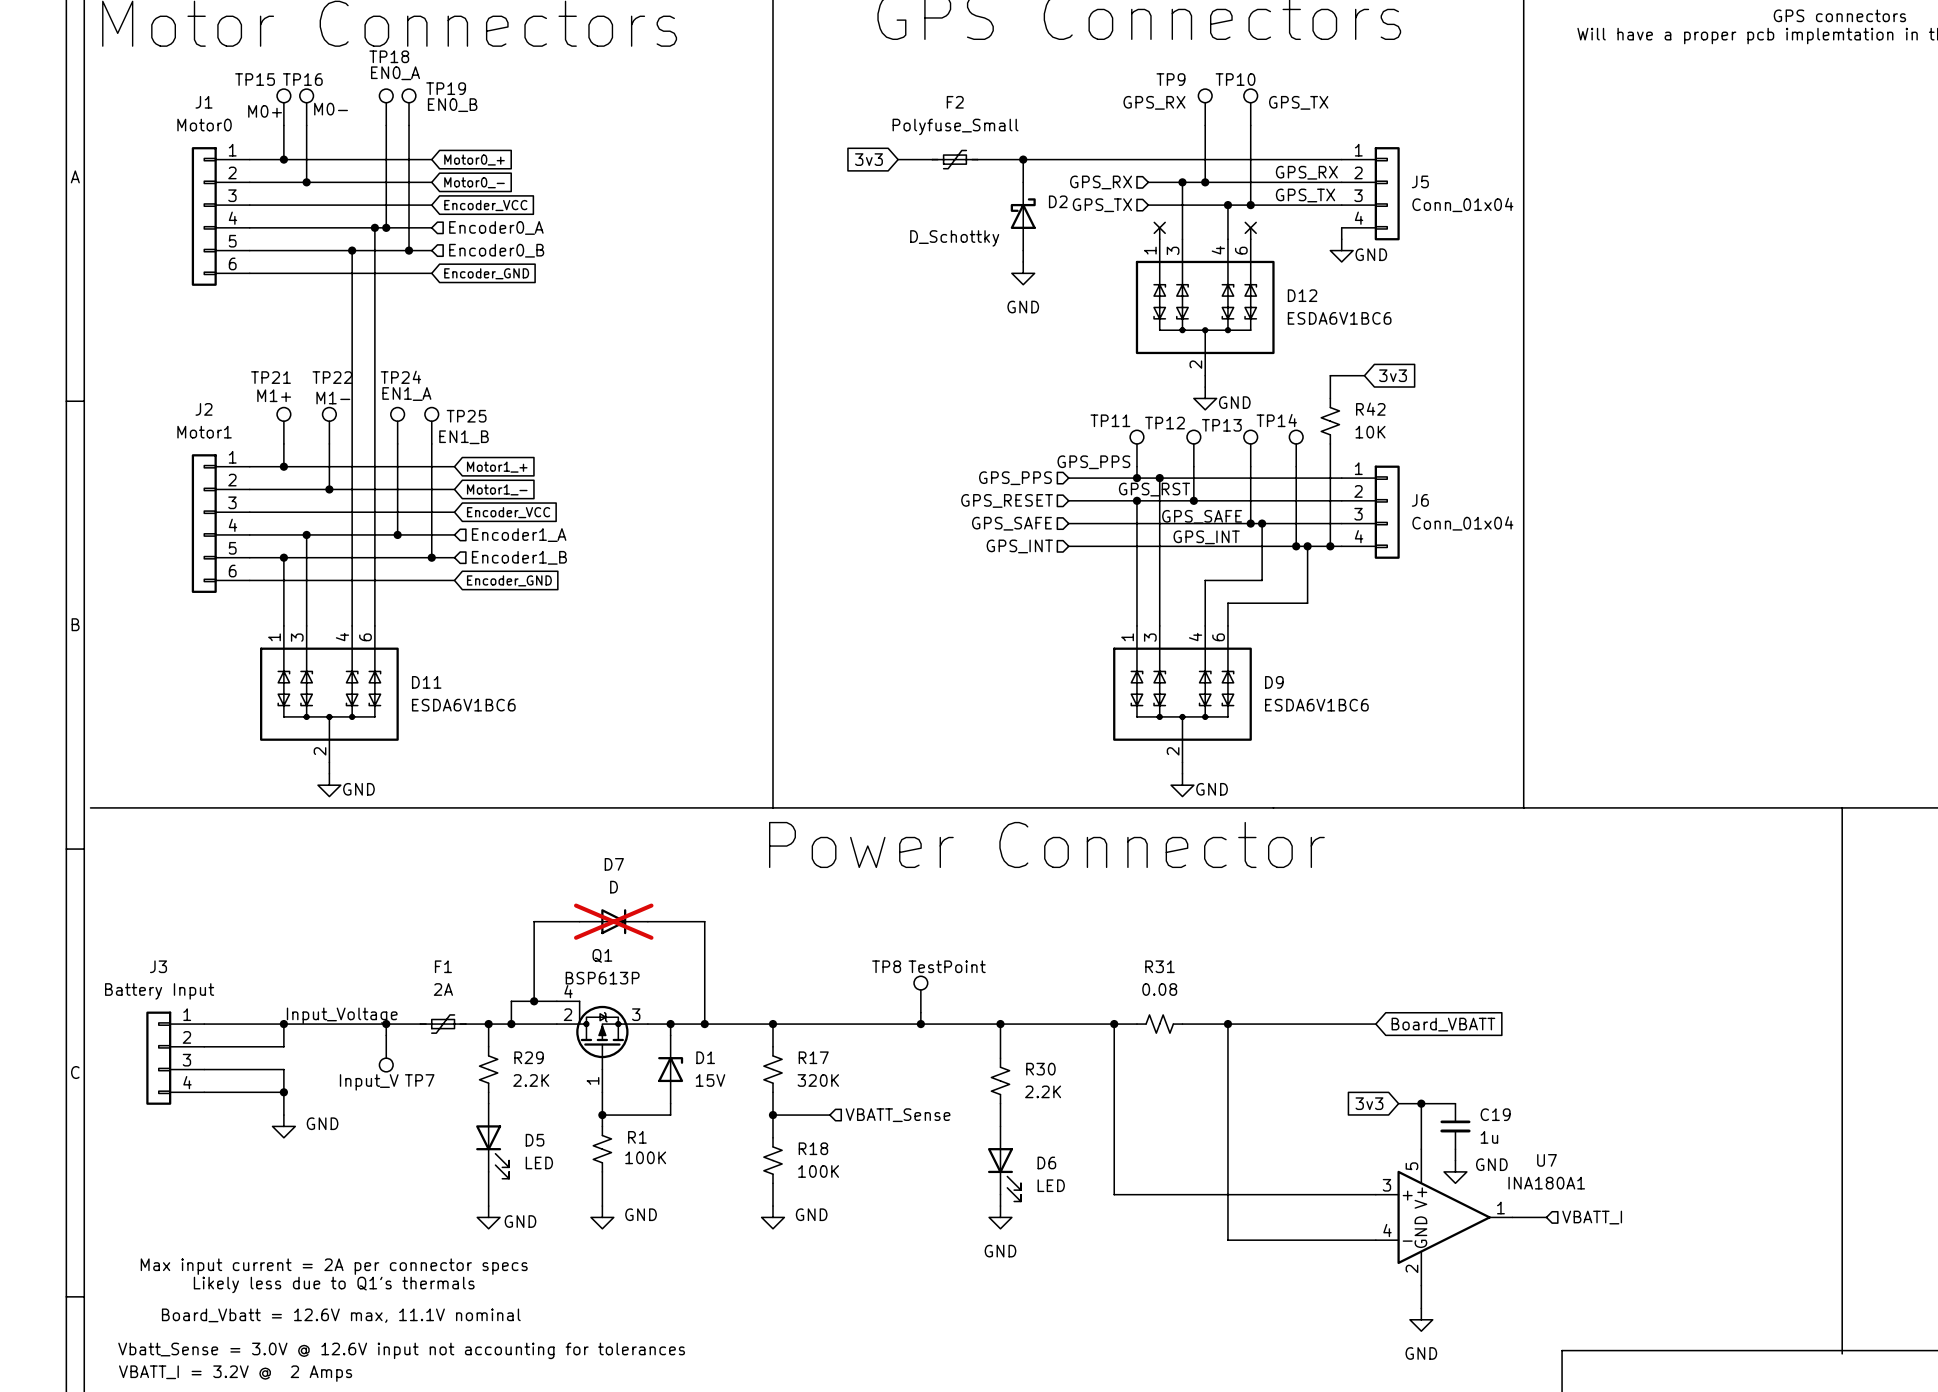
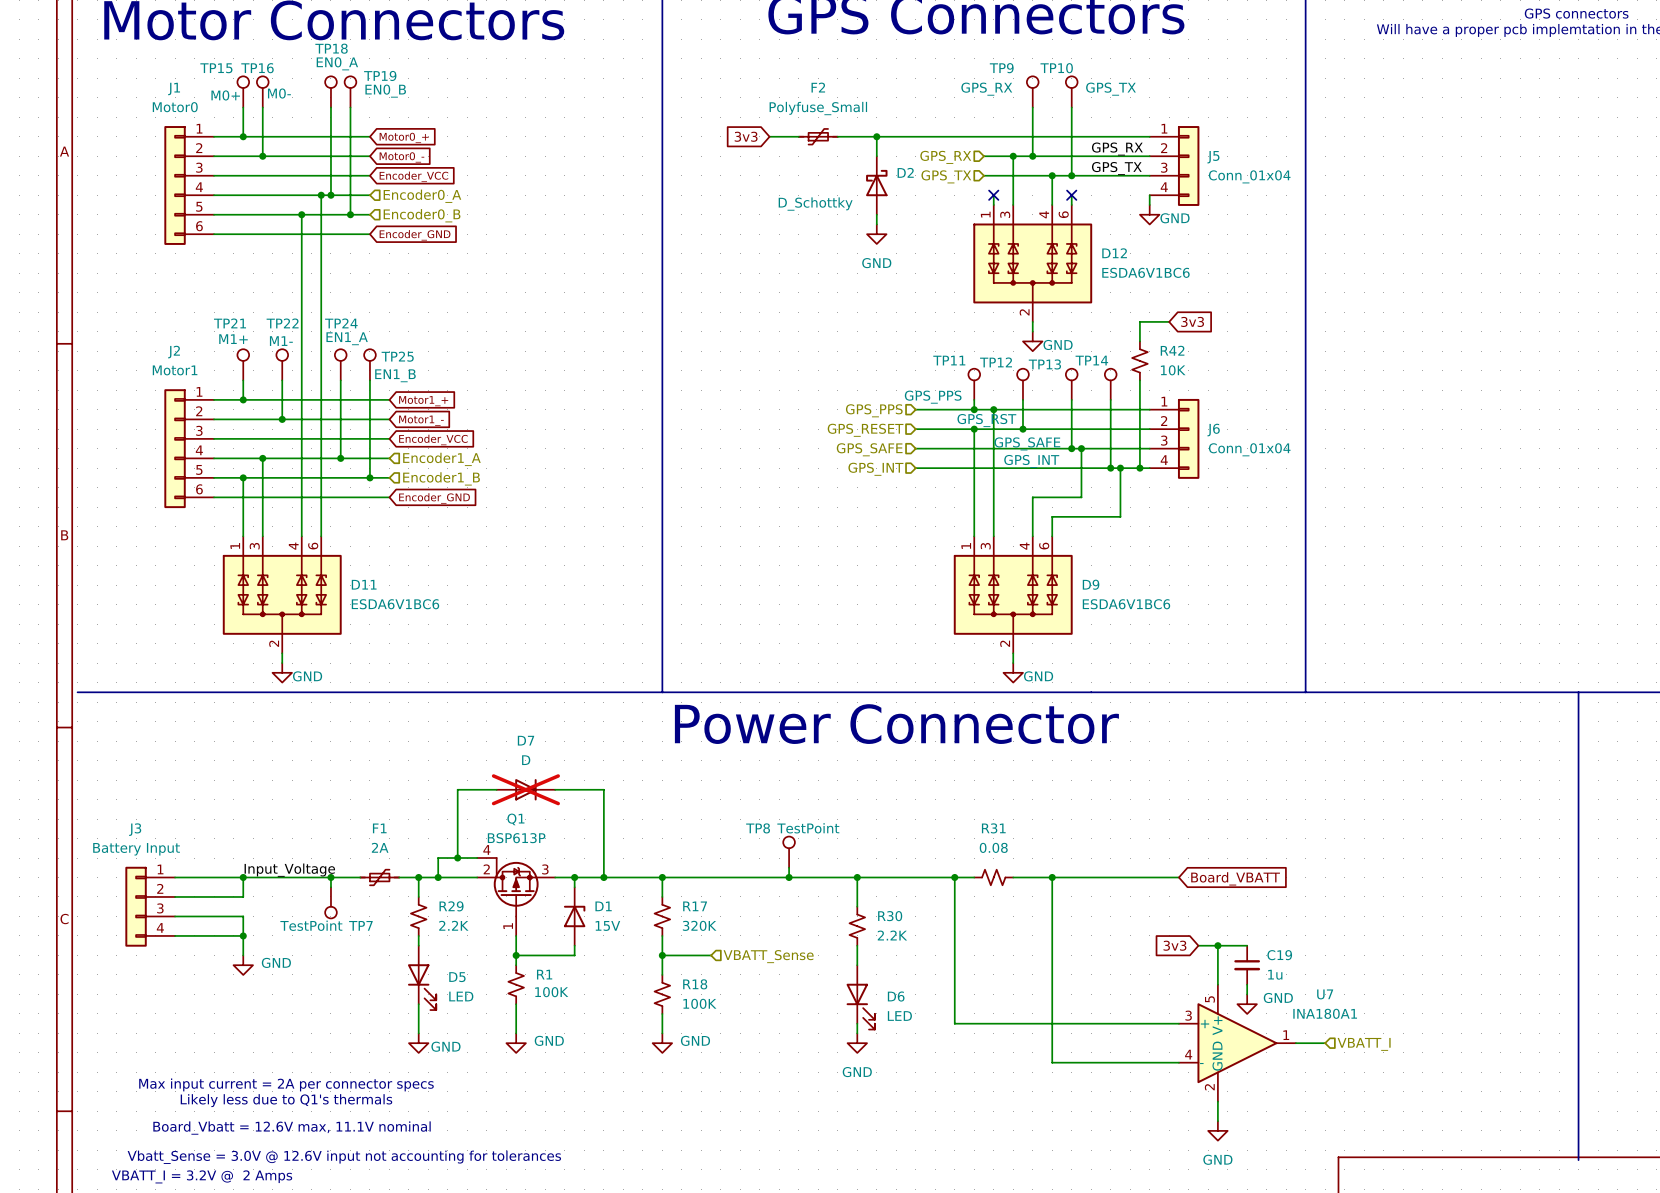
TP7 value: Input_V (369, 1082) -> TestPoint (311, 925)

